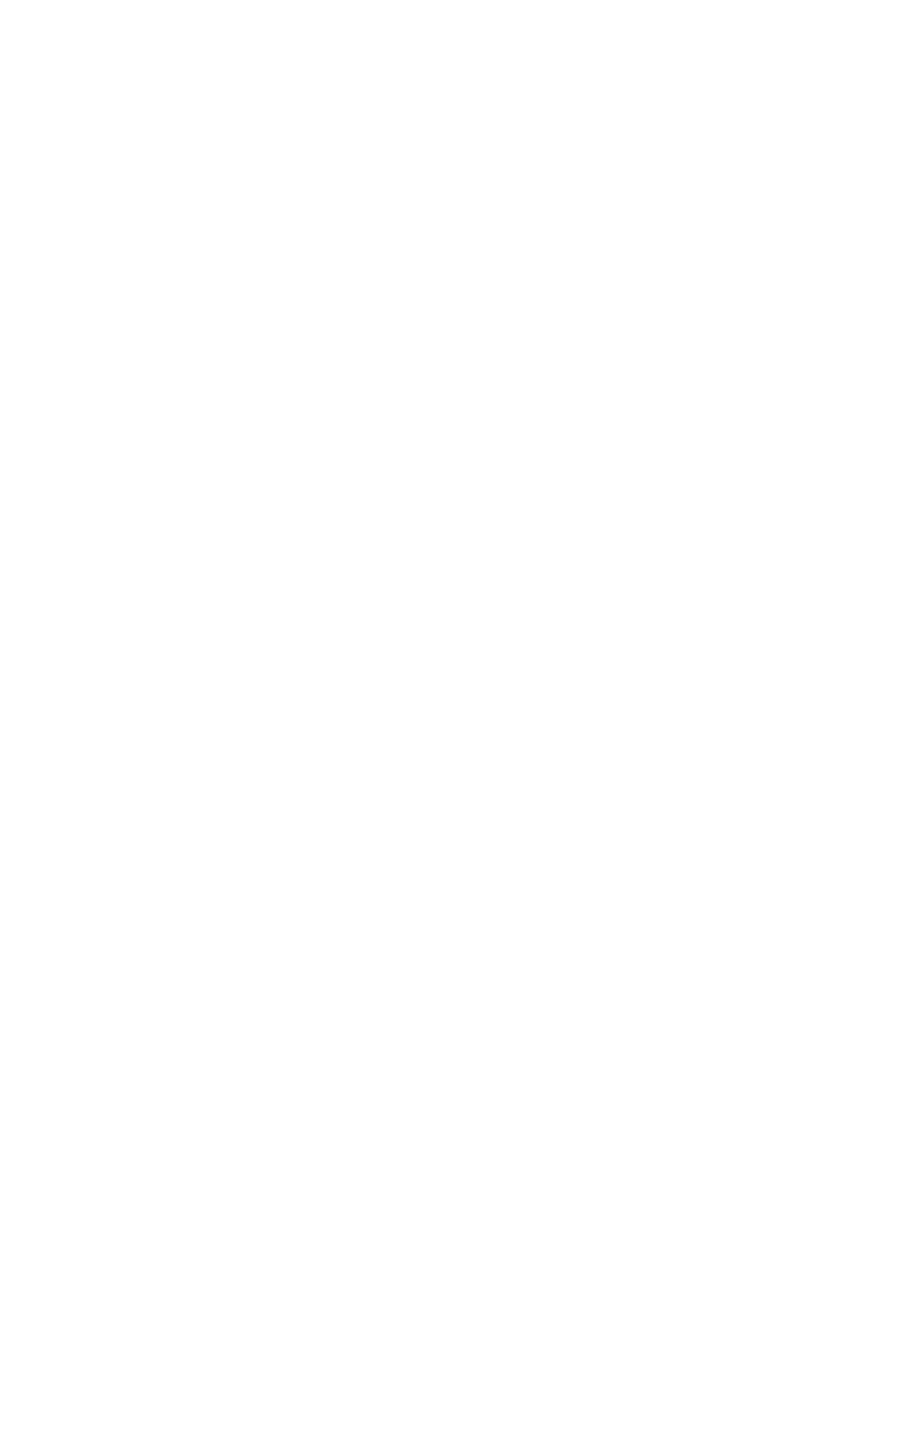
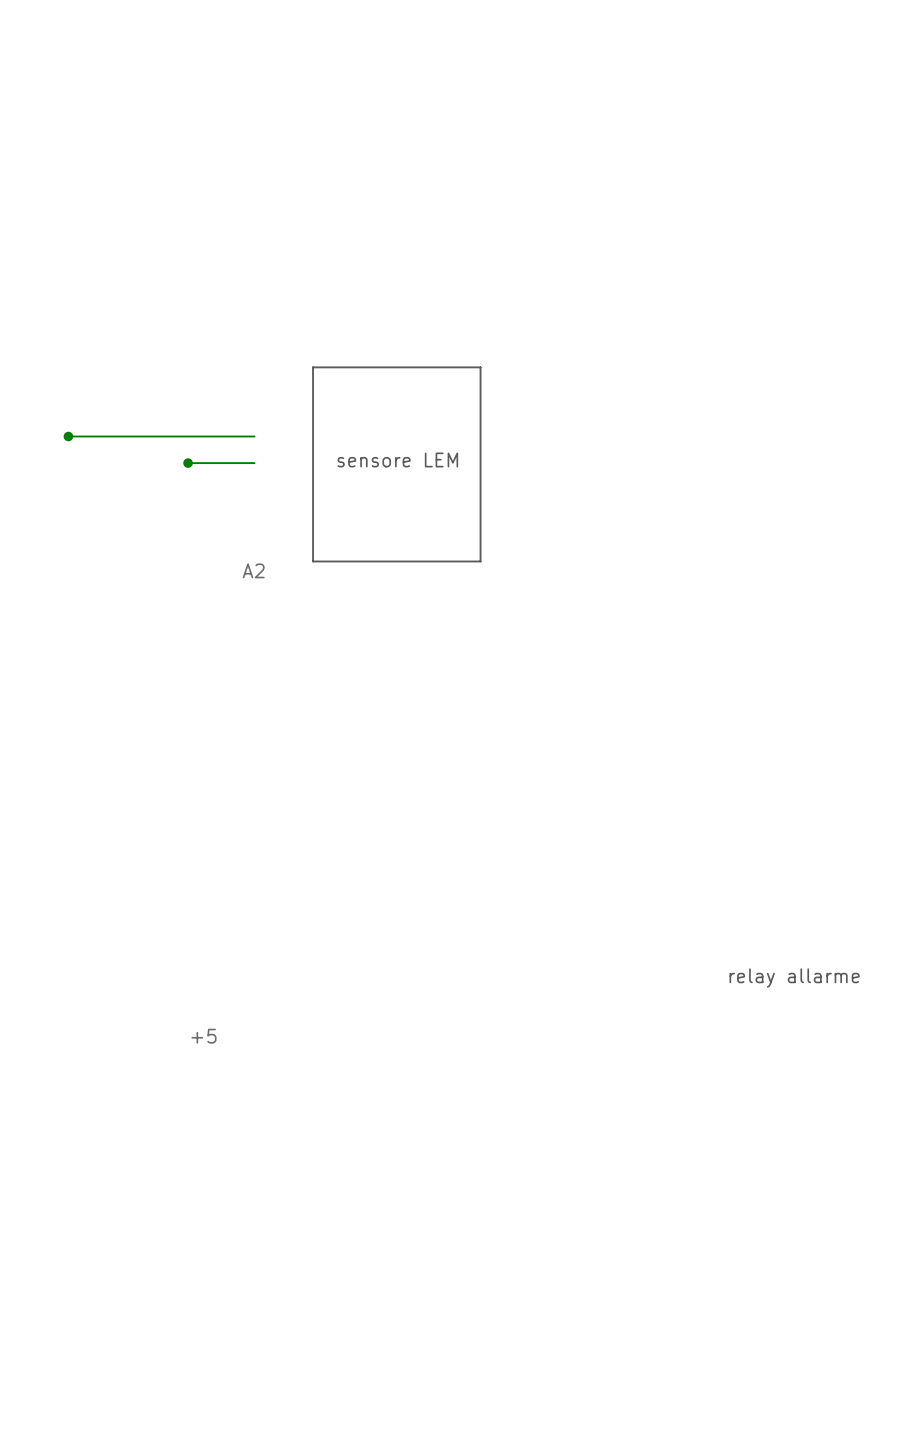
line: none -> (313, 367) (480, 367) (480, 561) (313, 561) (313, 367)
wire: none -> (68, 436) (254, 436)
junction: none -> (68, 436)
text: none -> sensore LEM (397, 459)
wire: none -> (188, 463) (254, 463)
junction: none -> (188, 463)
label: none -> A2 (253, 570)
text: none -> relay allarme (794, 978)
label: none -> +5 (204, 1036)

